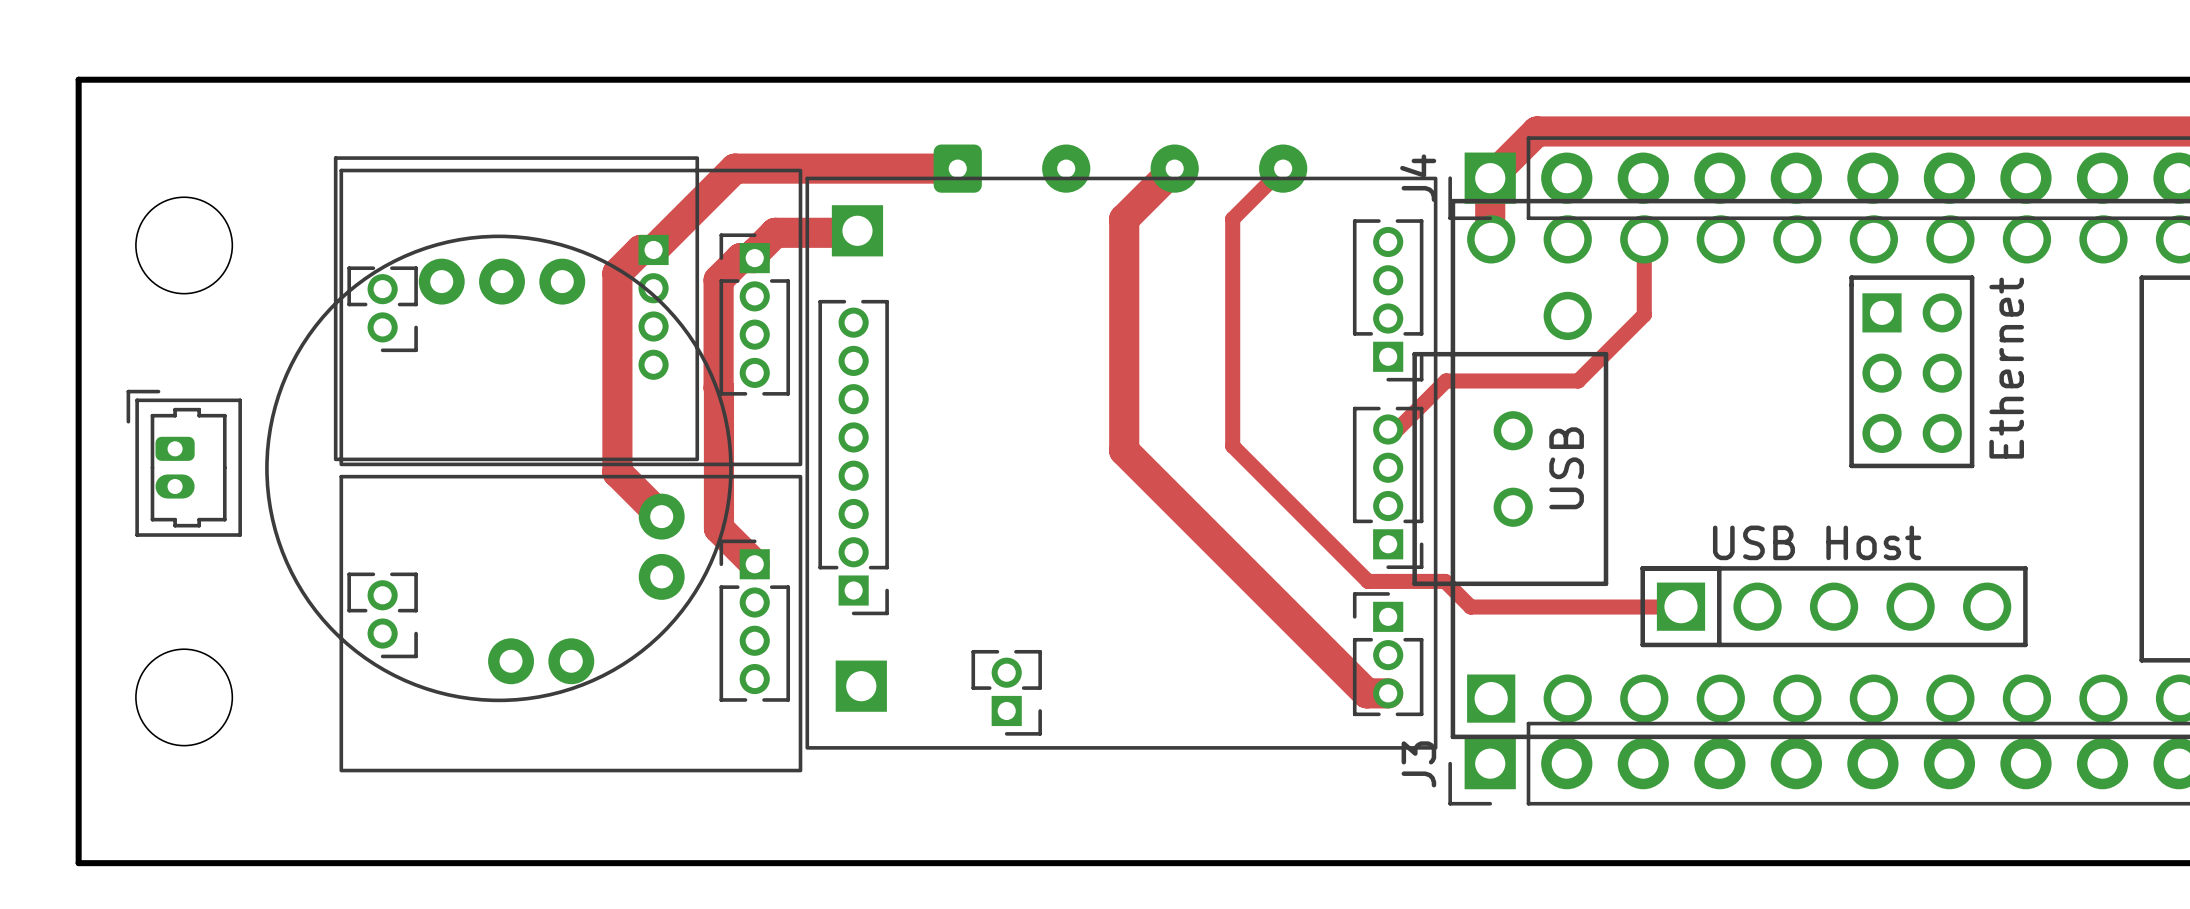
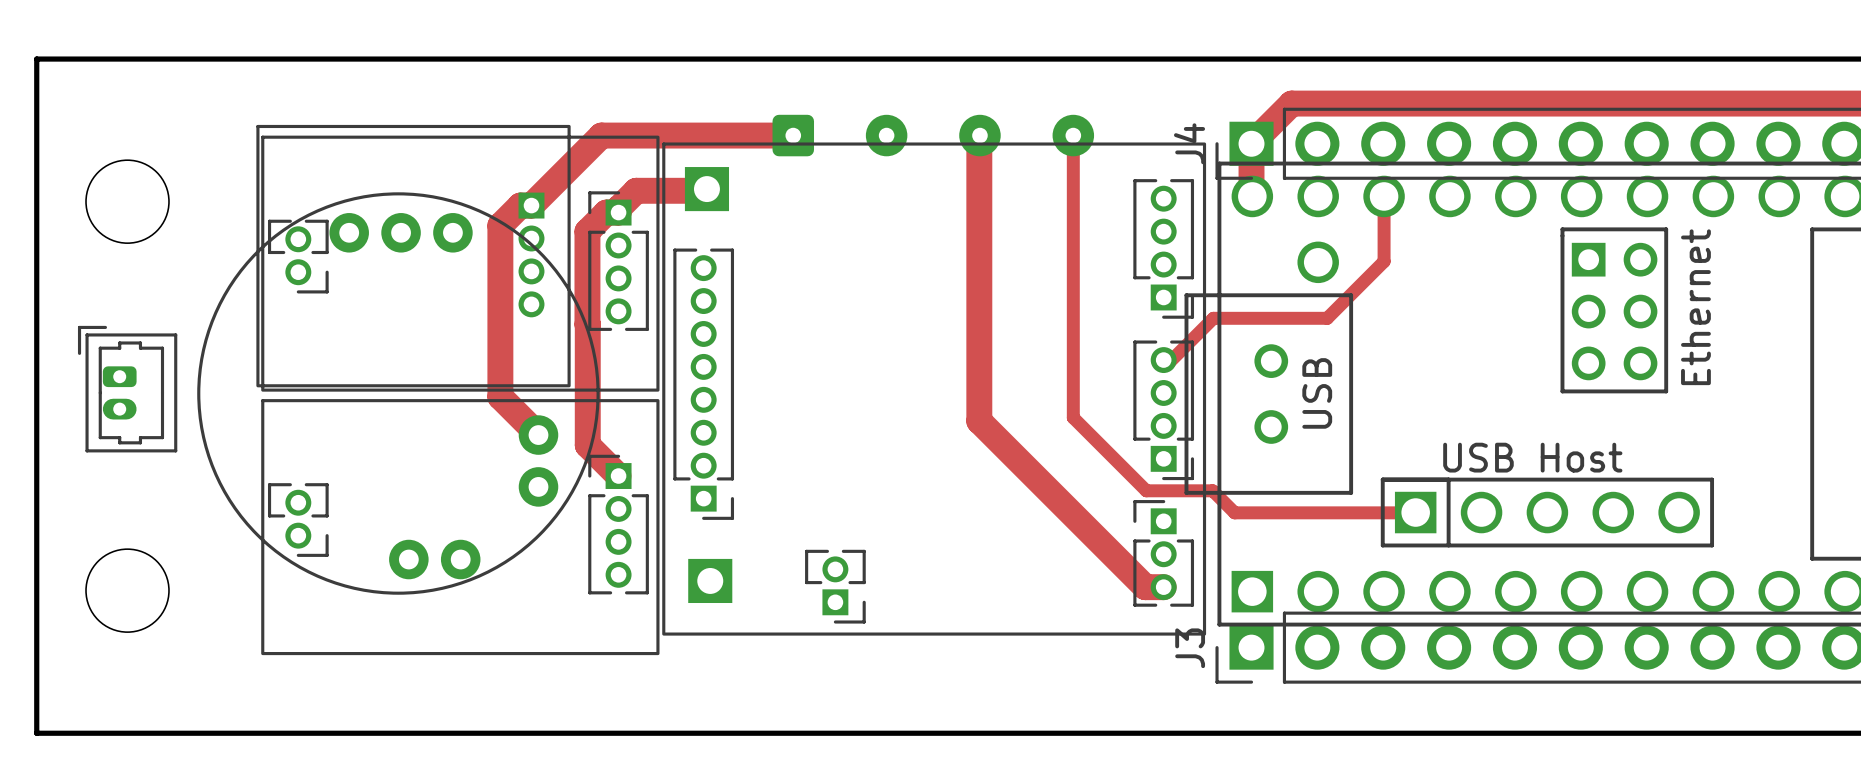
track: (1283, 168) (1232, 219) (1232, 446) (1283, 496) -> (1073, 135) (1073, 417)
track: (1173, 169) (1124, 219) (1124, 450) (1173, 500) -> (979, 136) (979, 421)

